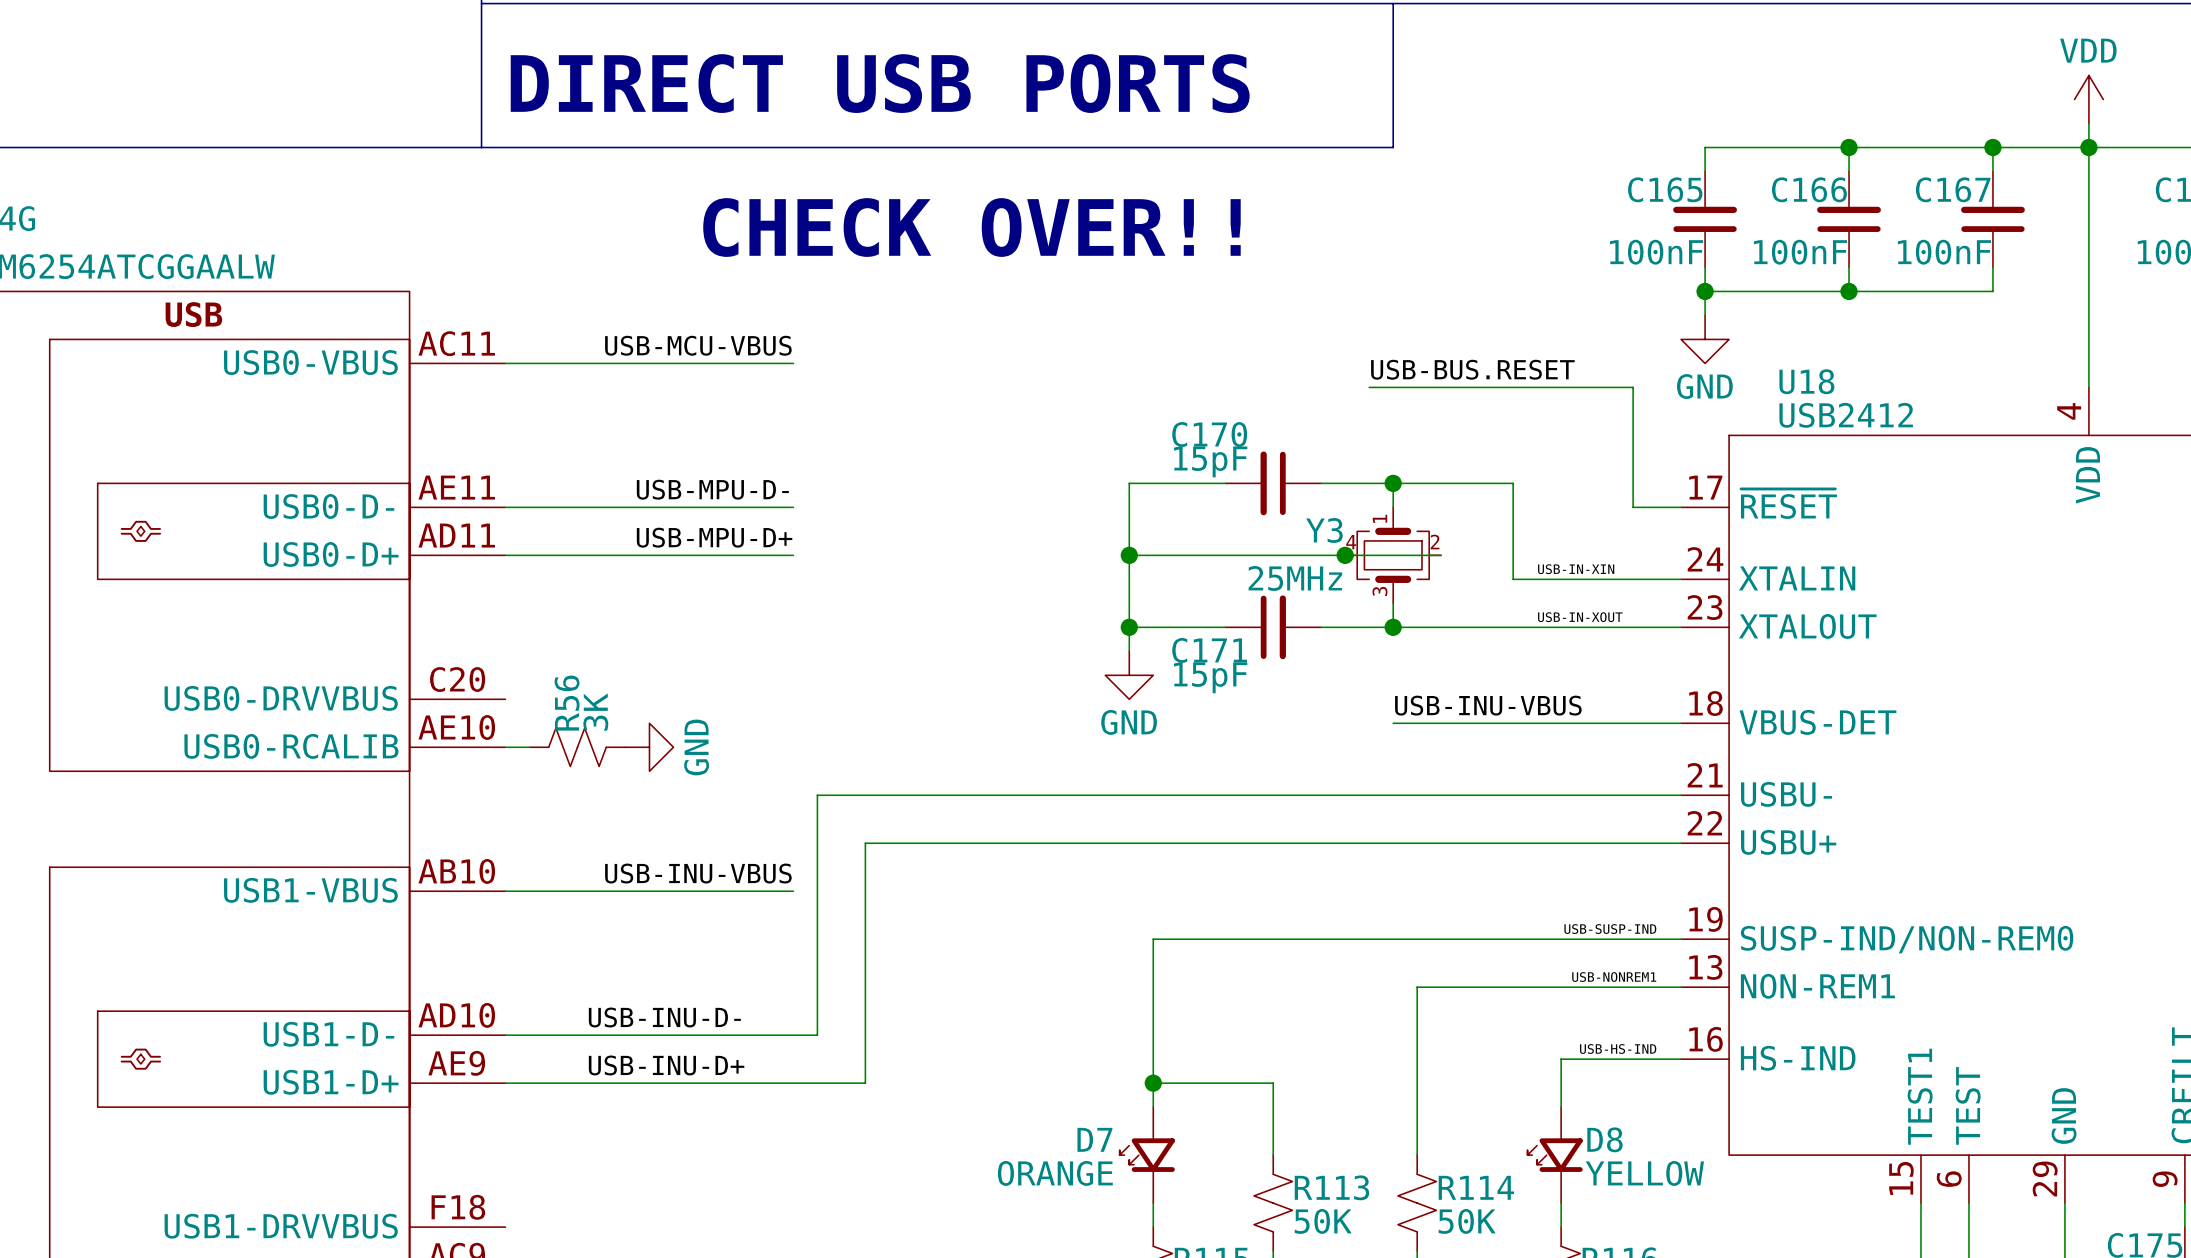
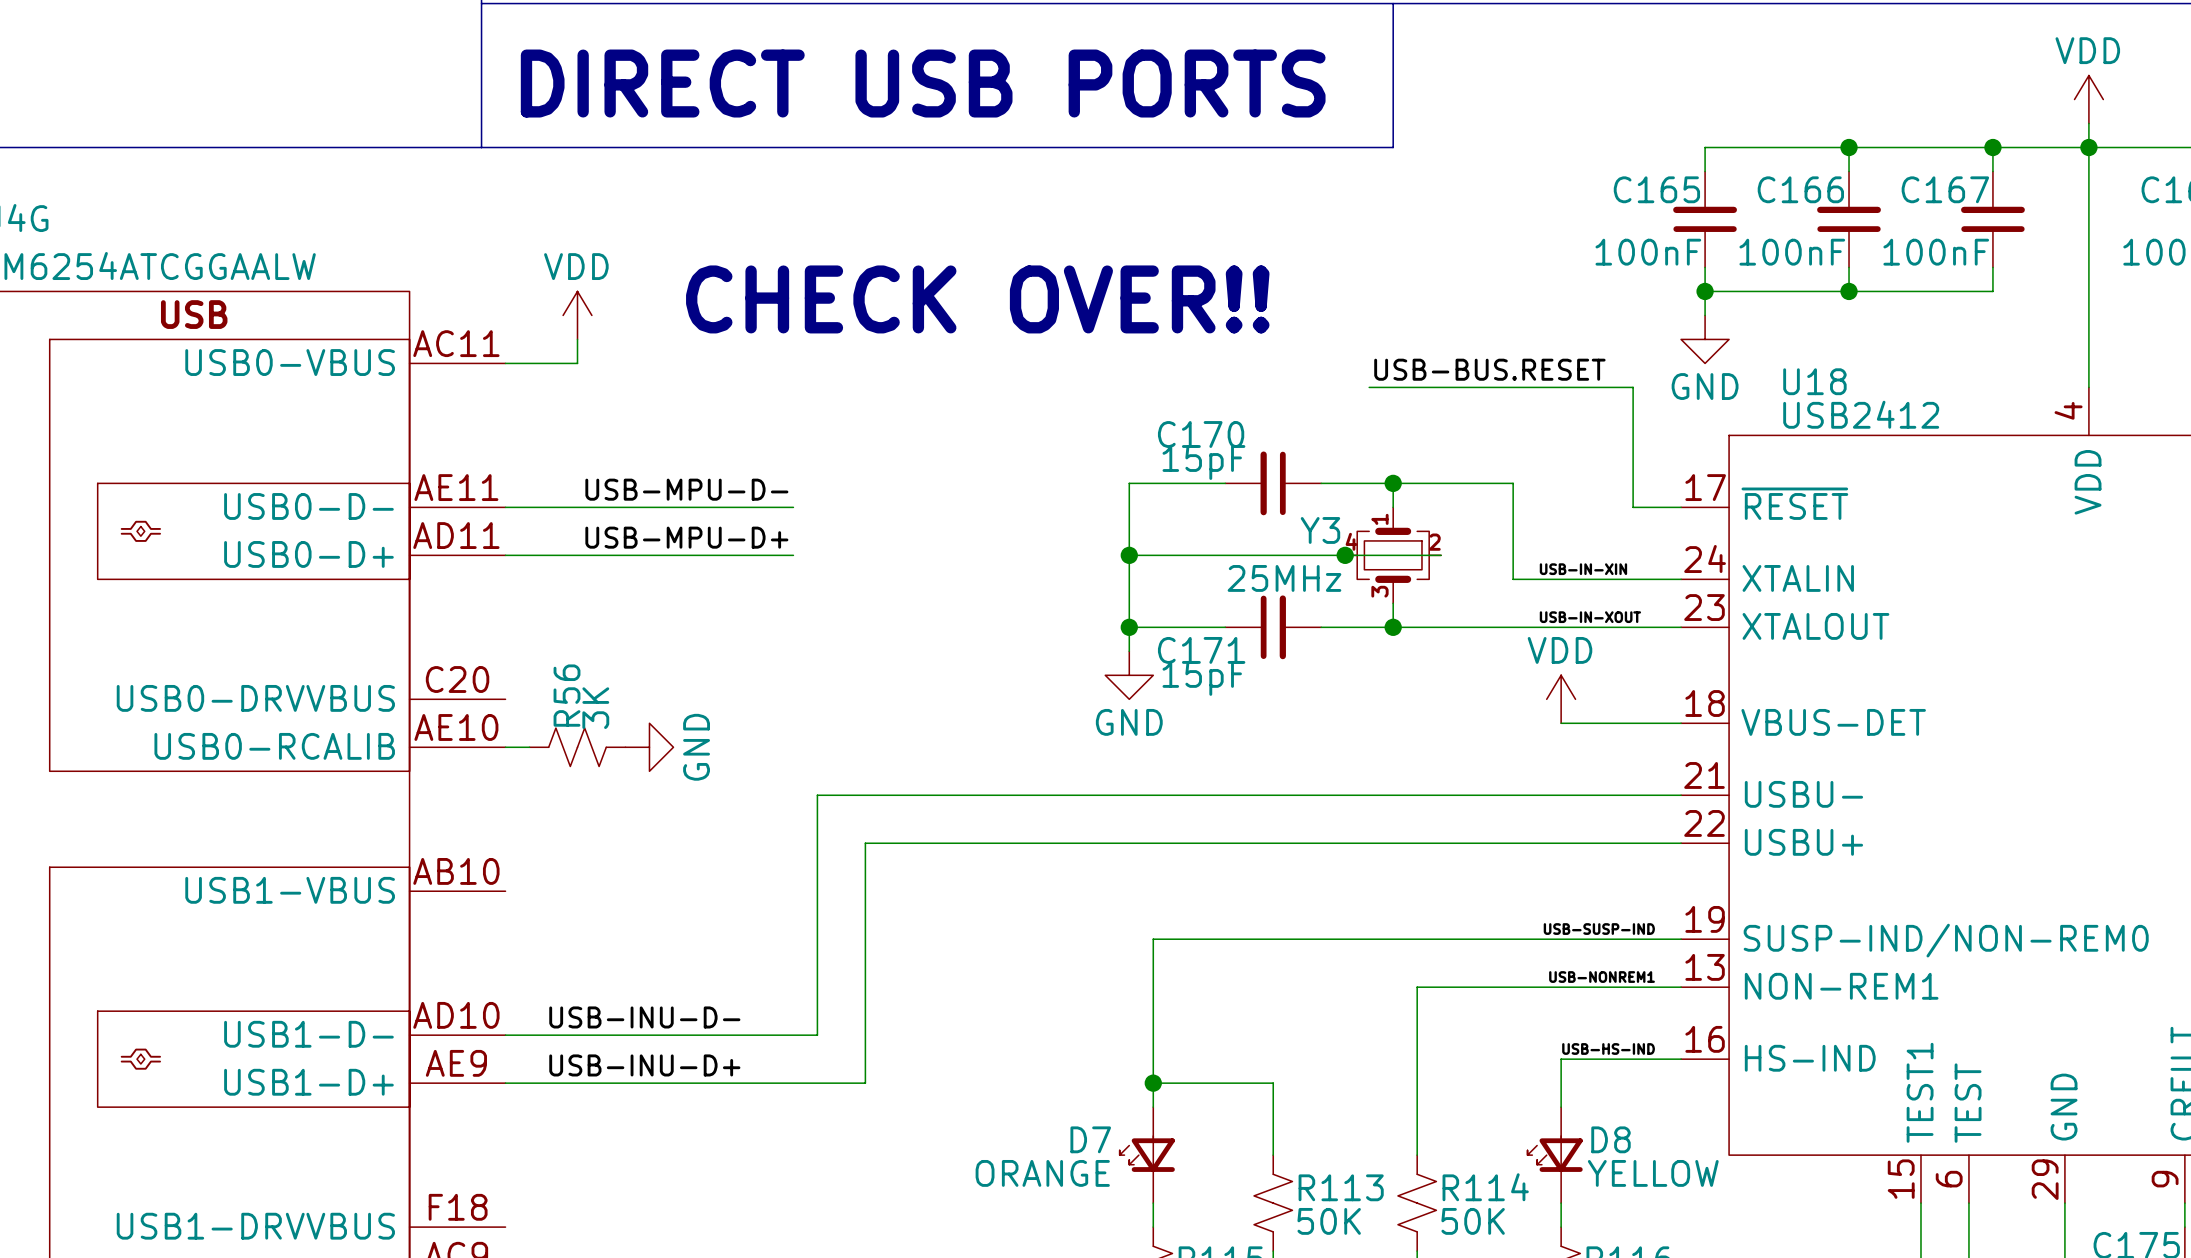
text position: CHECK OVER!! (971, 227) -> CHECK OVER!! (977, 299)
power symbol: none -> VDD (577, 315)
label: USB-MCU-VBUS (698, 345) -> none
wire: (577, 363) (793, 363) -> (577, 363) (577, 339)
power symbol: none -> VDD (1561, 699)
label: USB-INU-VBUS (1488, 705) -> none
wire: (1393, 723) (1561, 723) -> none
label: USB-INU-VBUS (698, 873) -> none
wire: (505, 891) (793, 891) -> none
D7 symbol: [1119, 1107, 1175, 1204] -> [1119, 1107, 1175, 1204]
D8 symbol: [1527, 1107, 1583, 1204] -> [1527, 1107, 1583, 1204]

